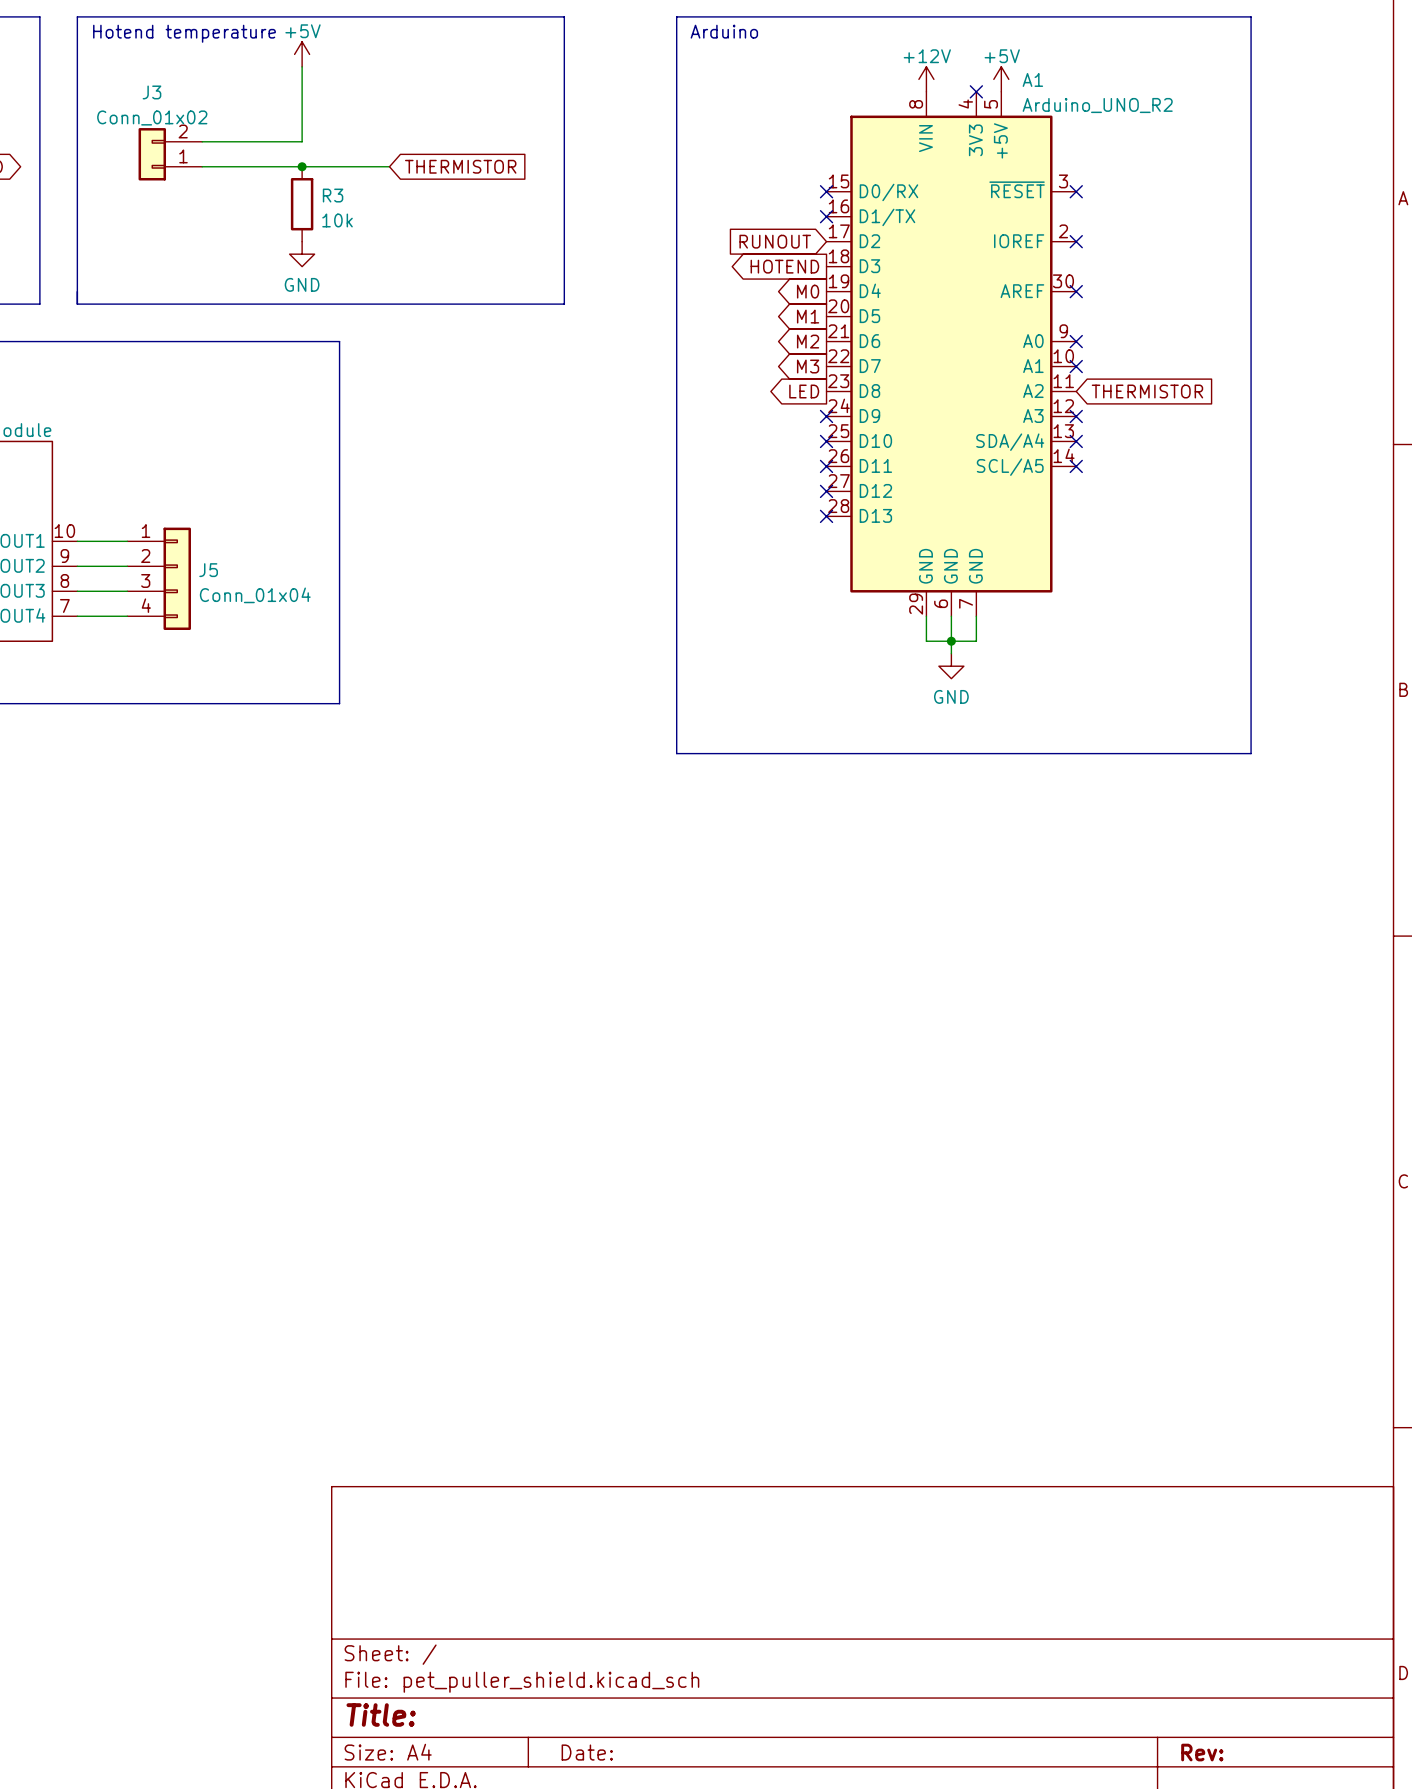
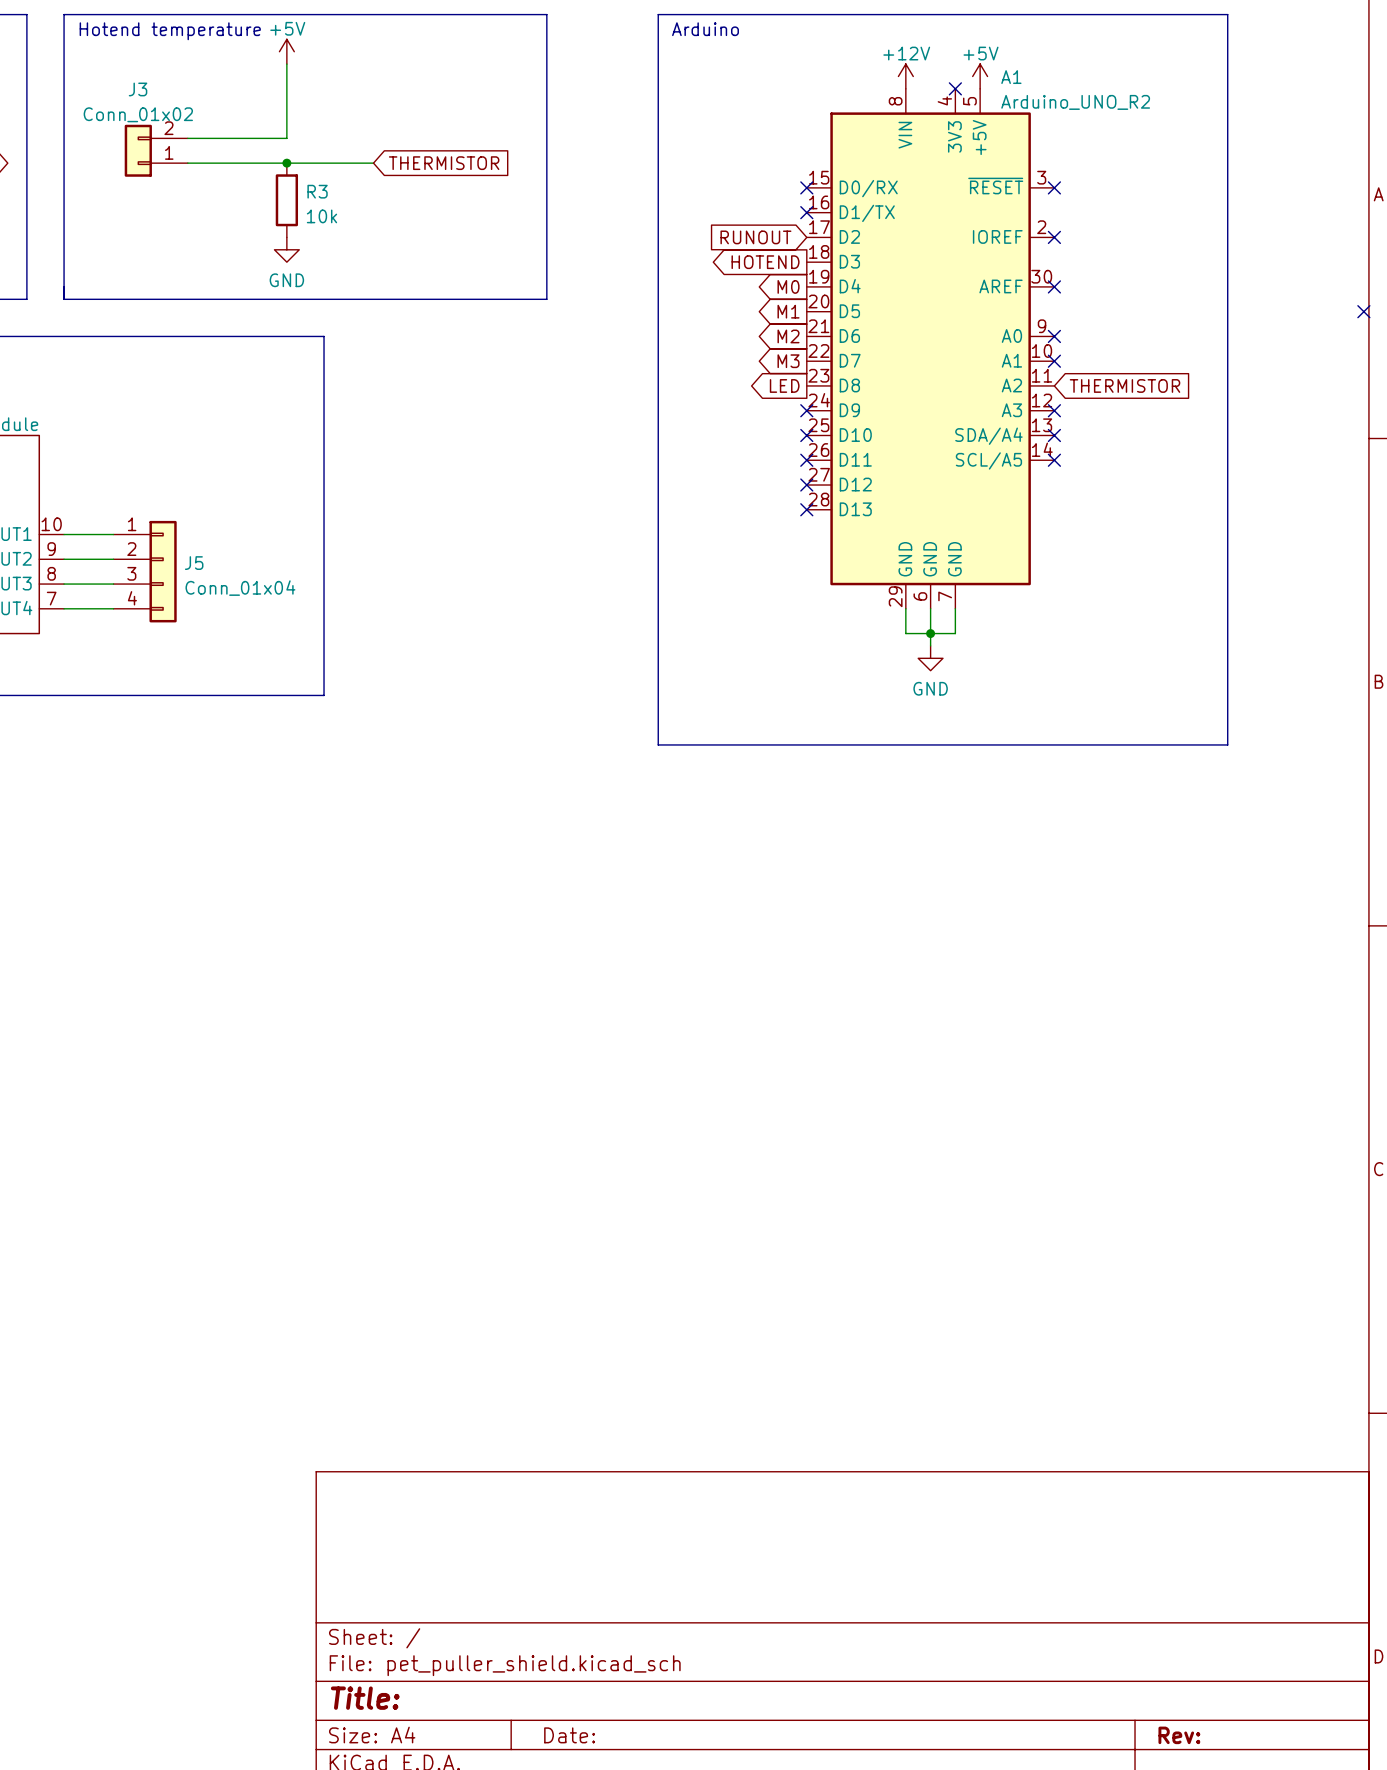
no-connect mark: none -> (1363, 311)

